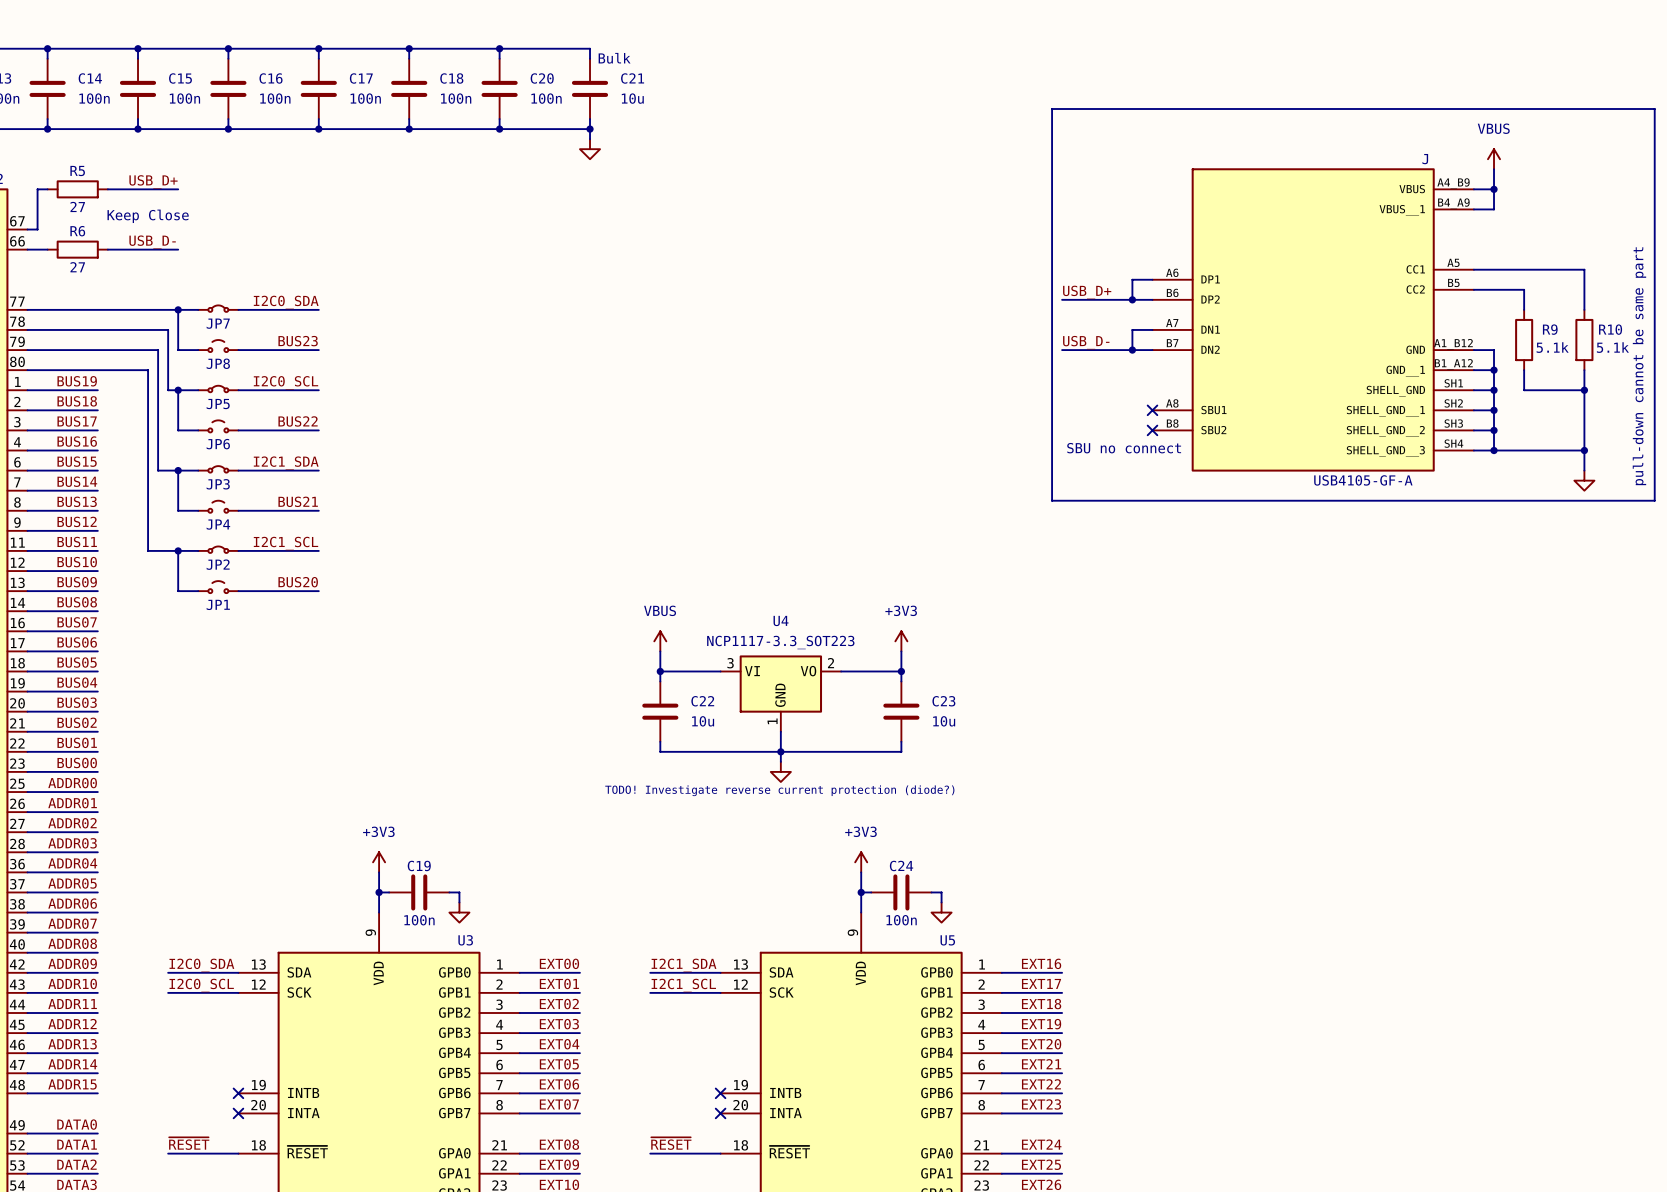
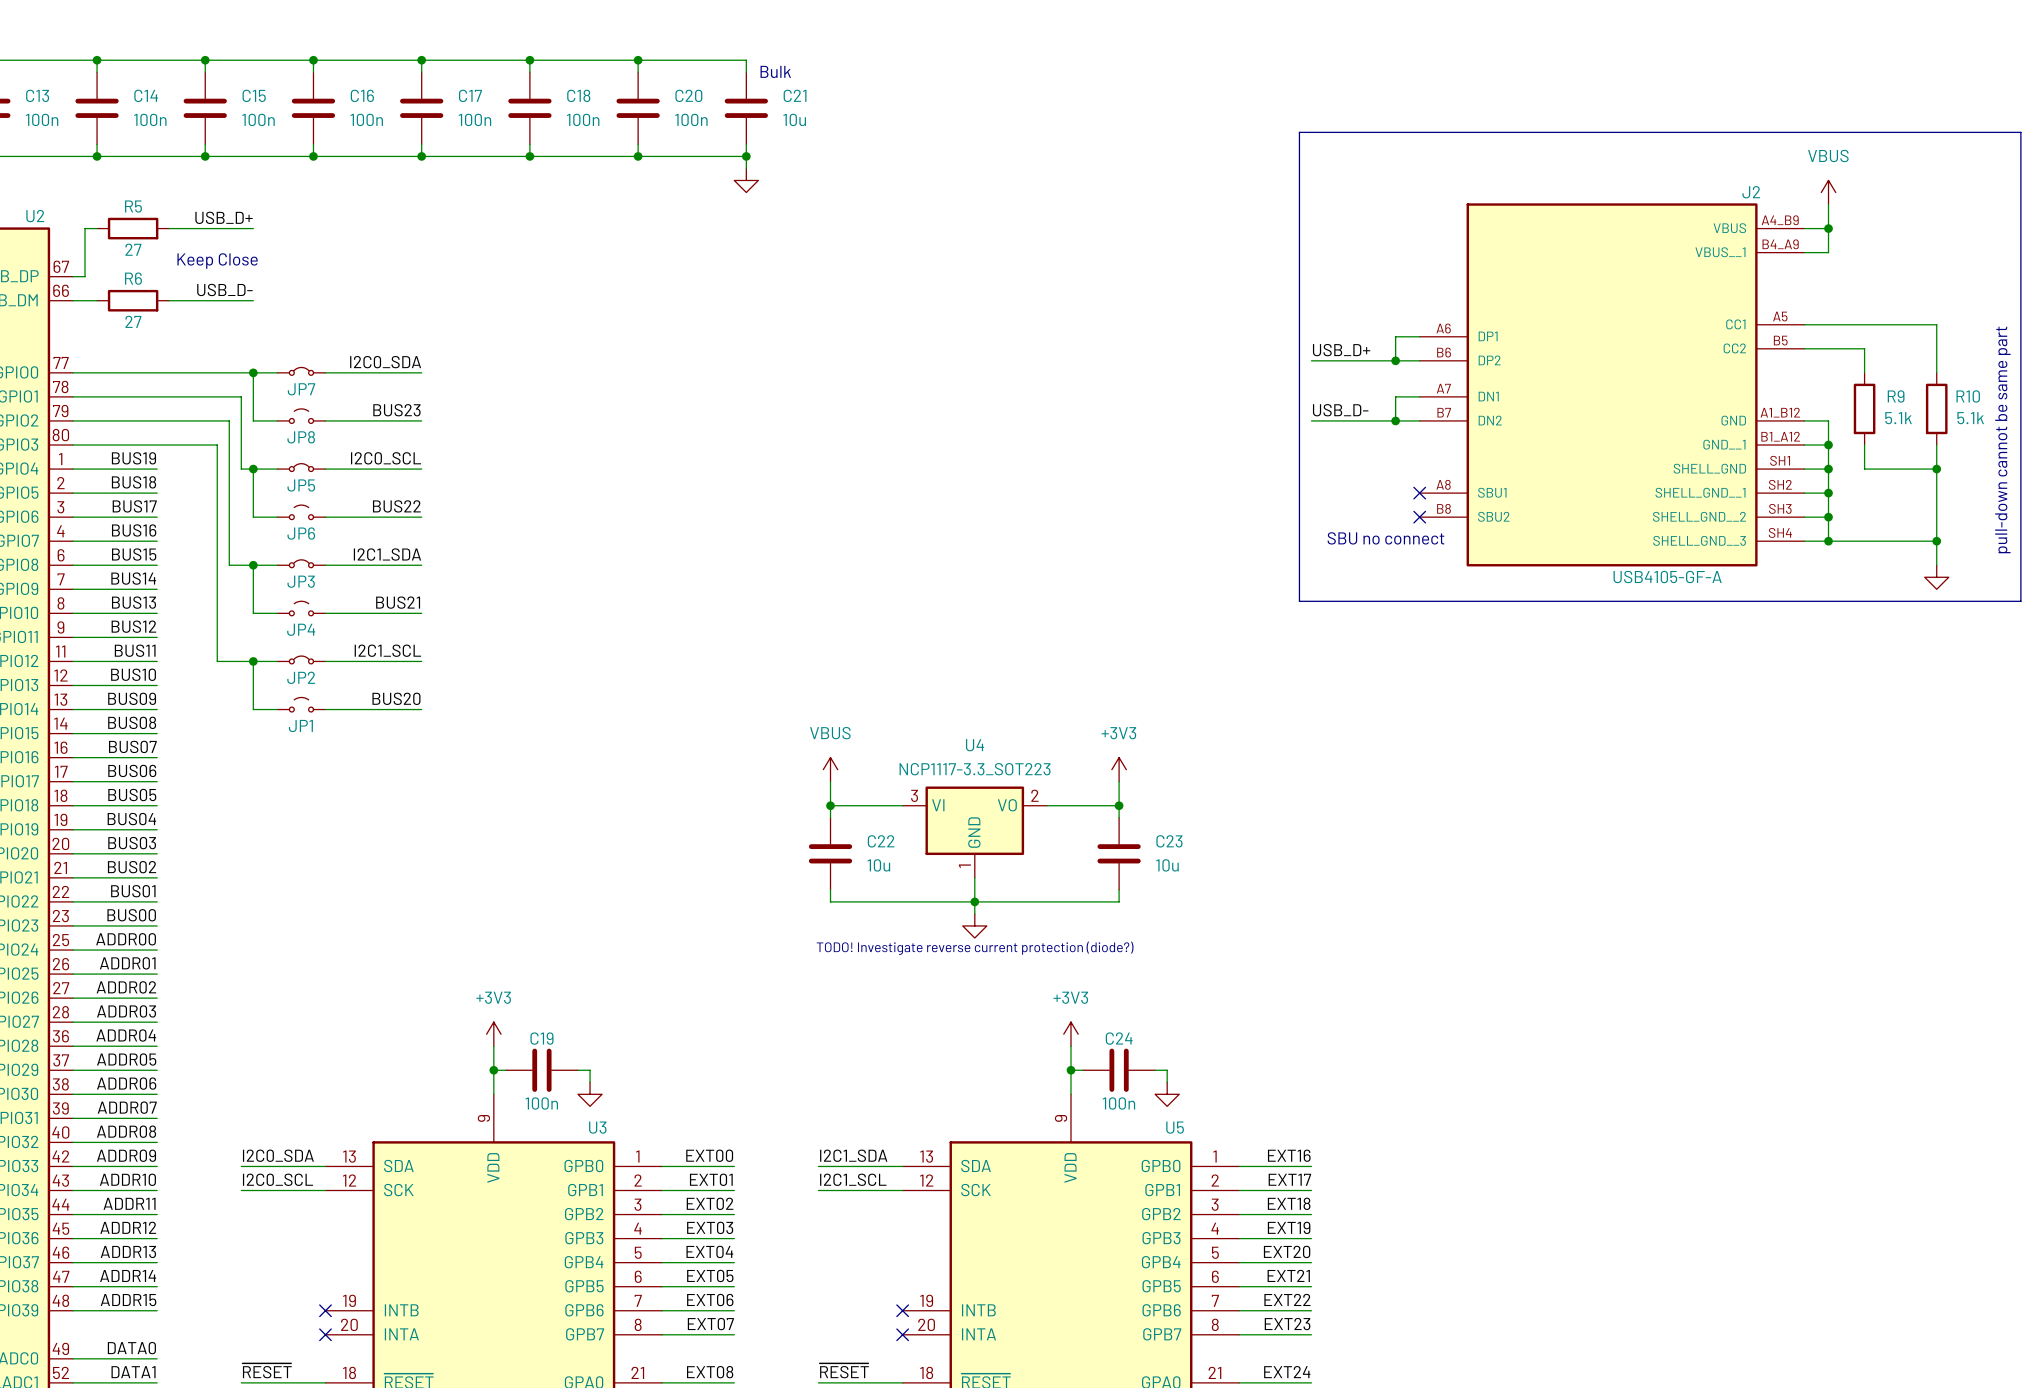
J name: J (1425, 159) -> J2 (1751, 192)

